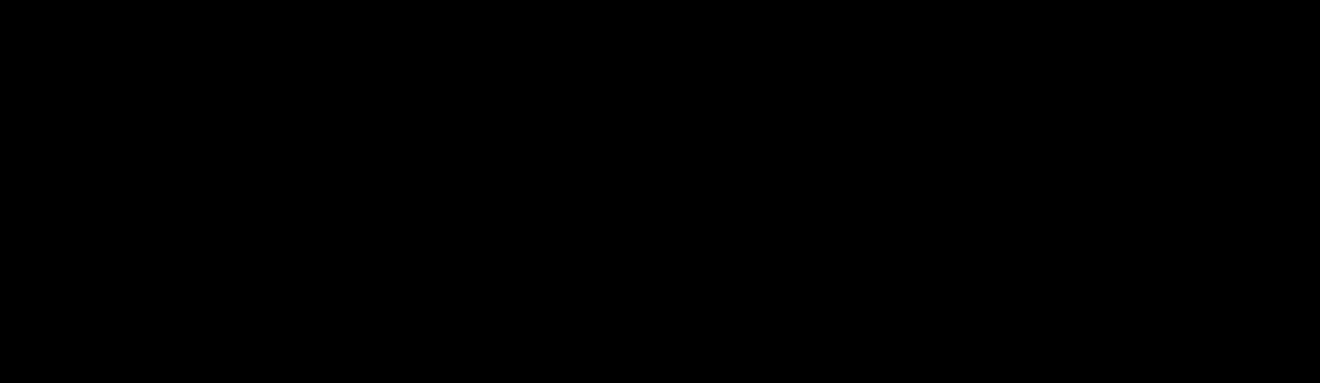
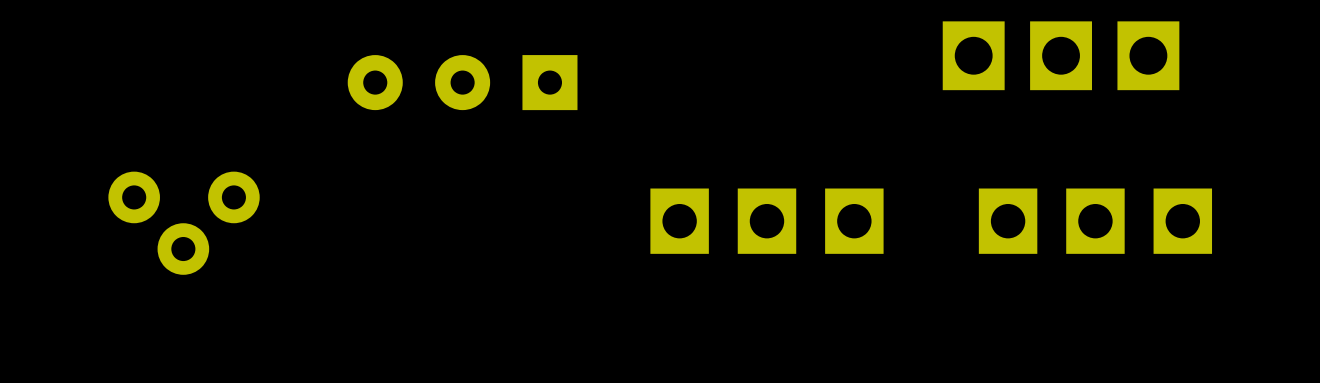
part: none -> (1061, 55)
part: none -> (462, 82)
part: none -> (766, 221)
part: none -> (1095, 221)
part: none -> (184, 223)

